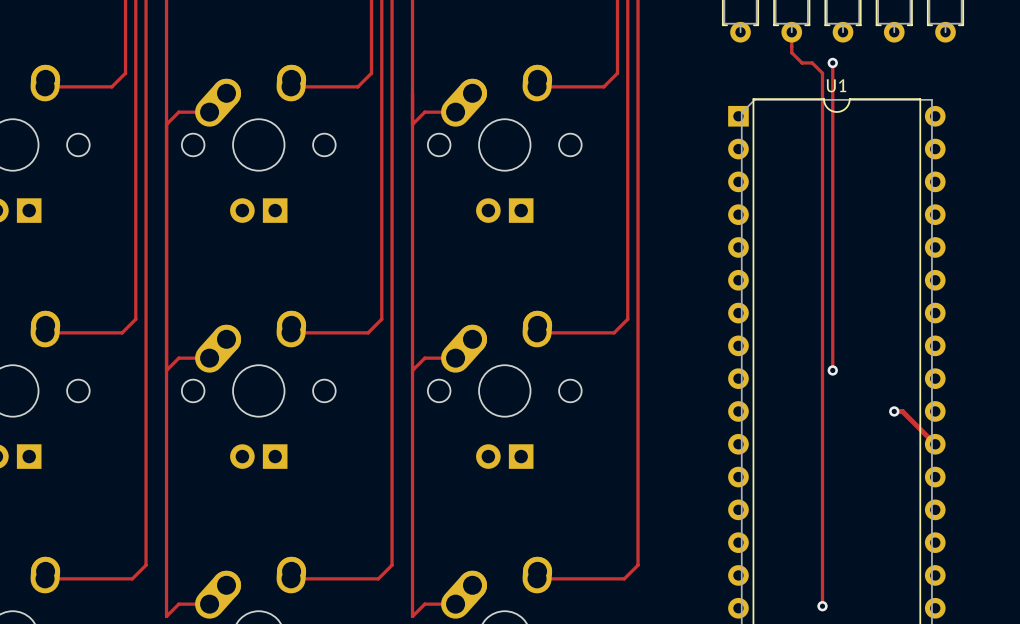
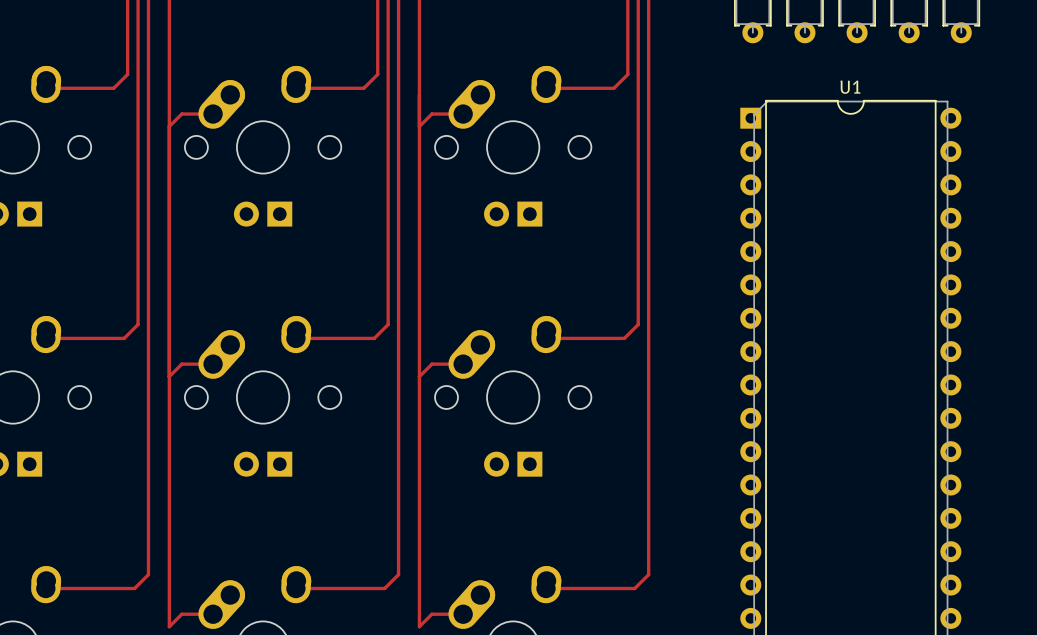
track: (791, 32) (791, 52) (802, 62) (812, 62) (822, 73) (822, 606) -> none
track: (832, 62) (832, 370) -> none
via: (832, 62) -> none
via: (832, 370) -> none
track: (894, 411) (902, 411) (935, 444) -> none
via: (894, 411) -> none
via: (822, 606) -> none

